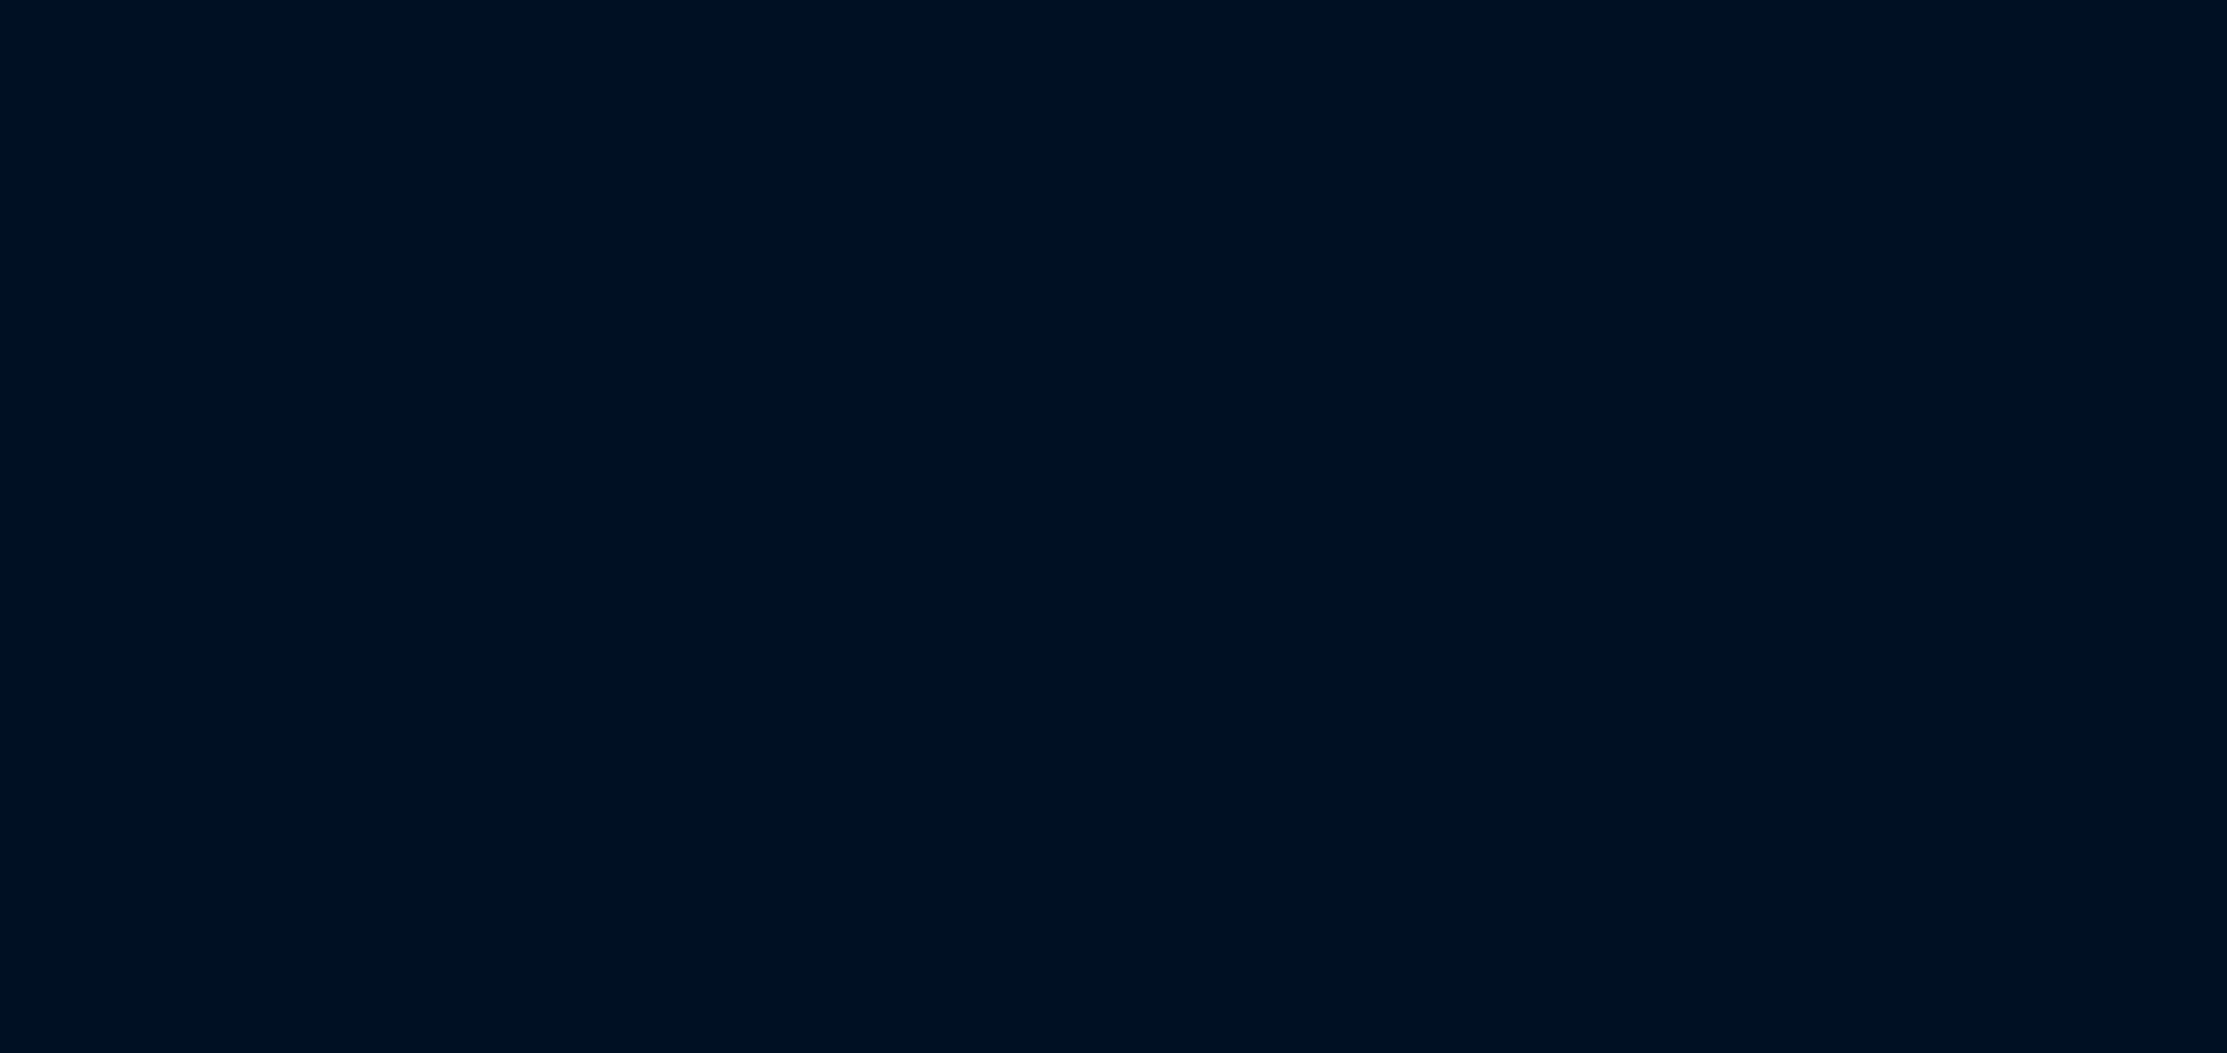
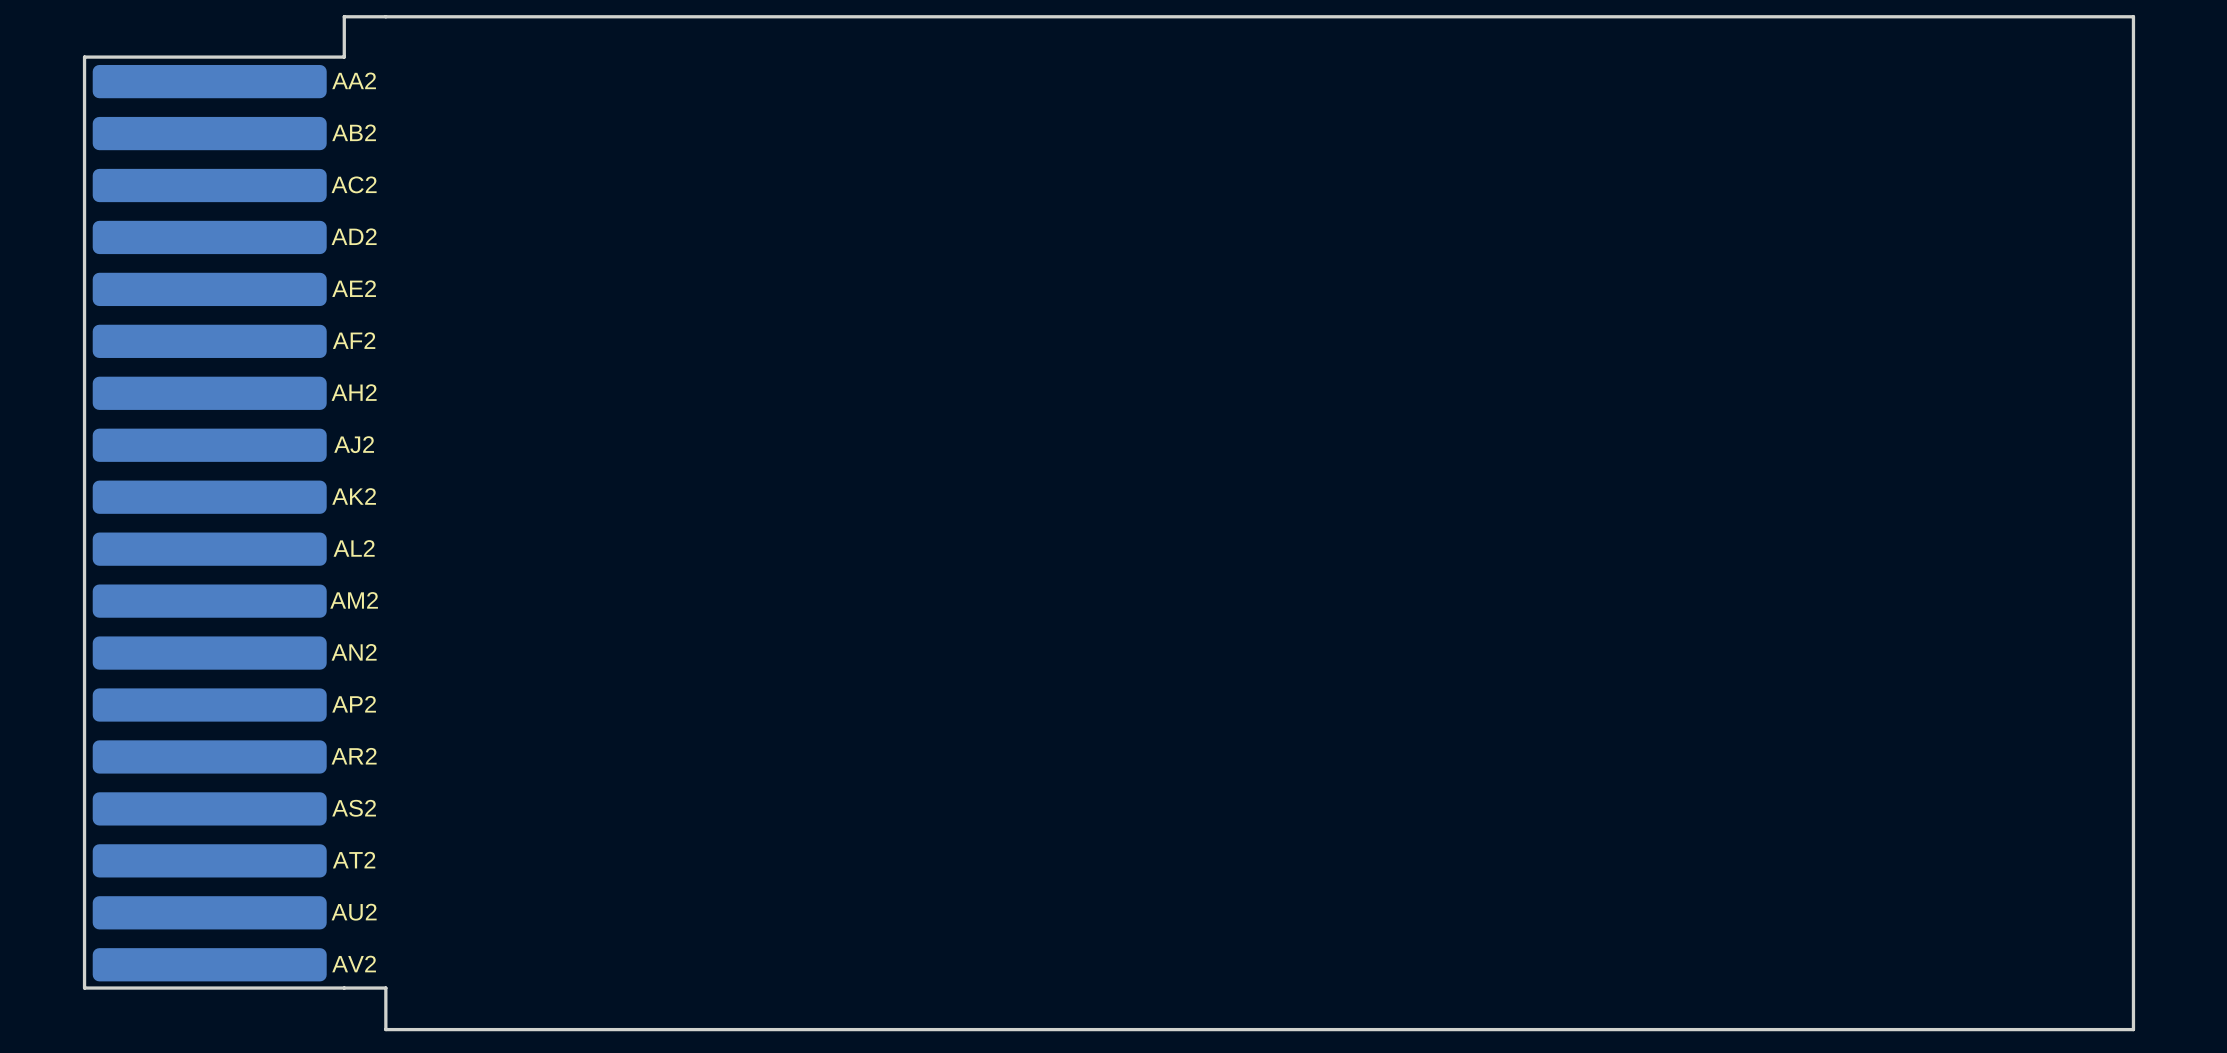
part: none -> (1109, 523)

